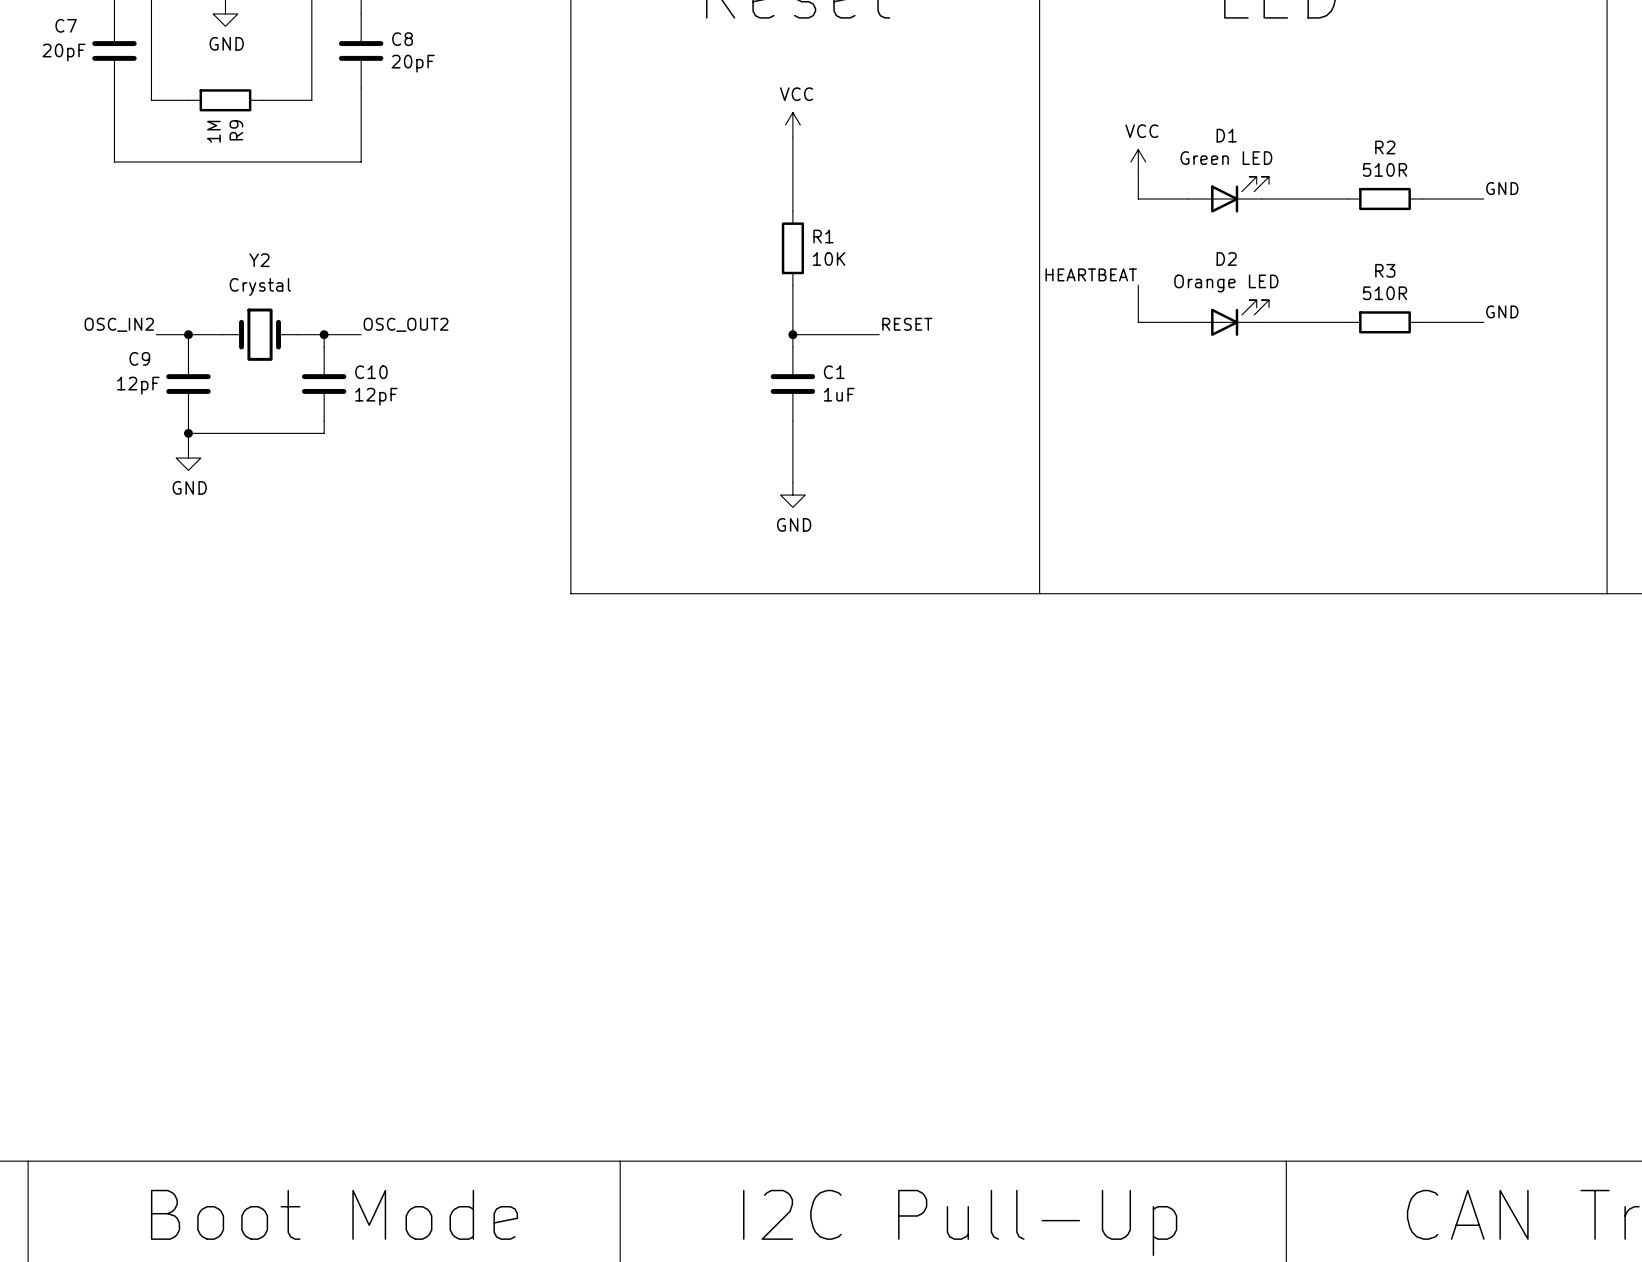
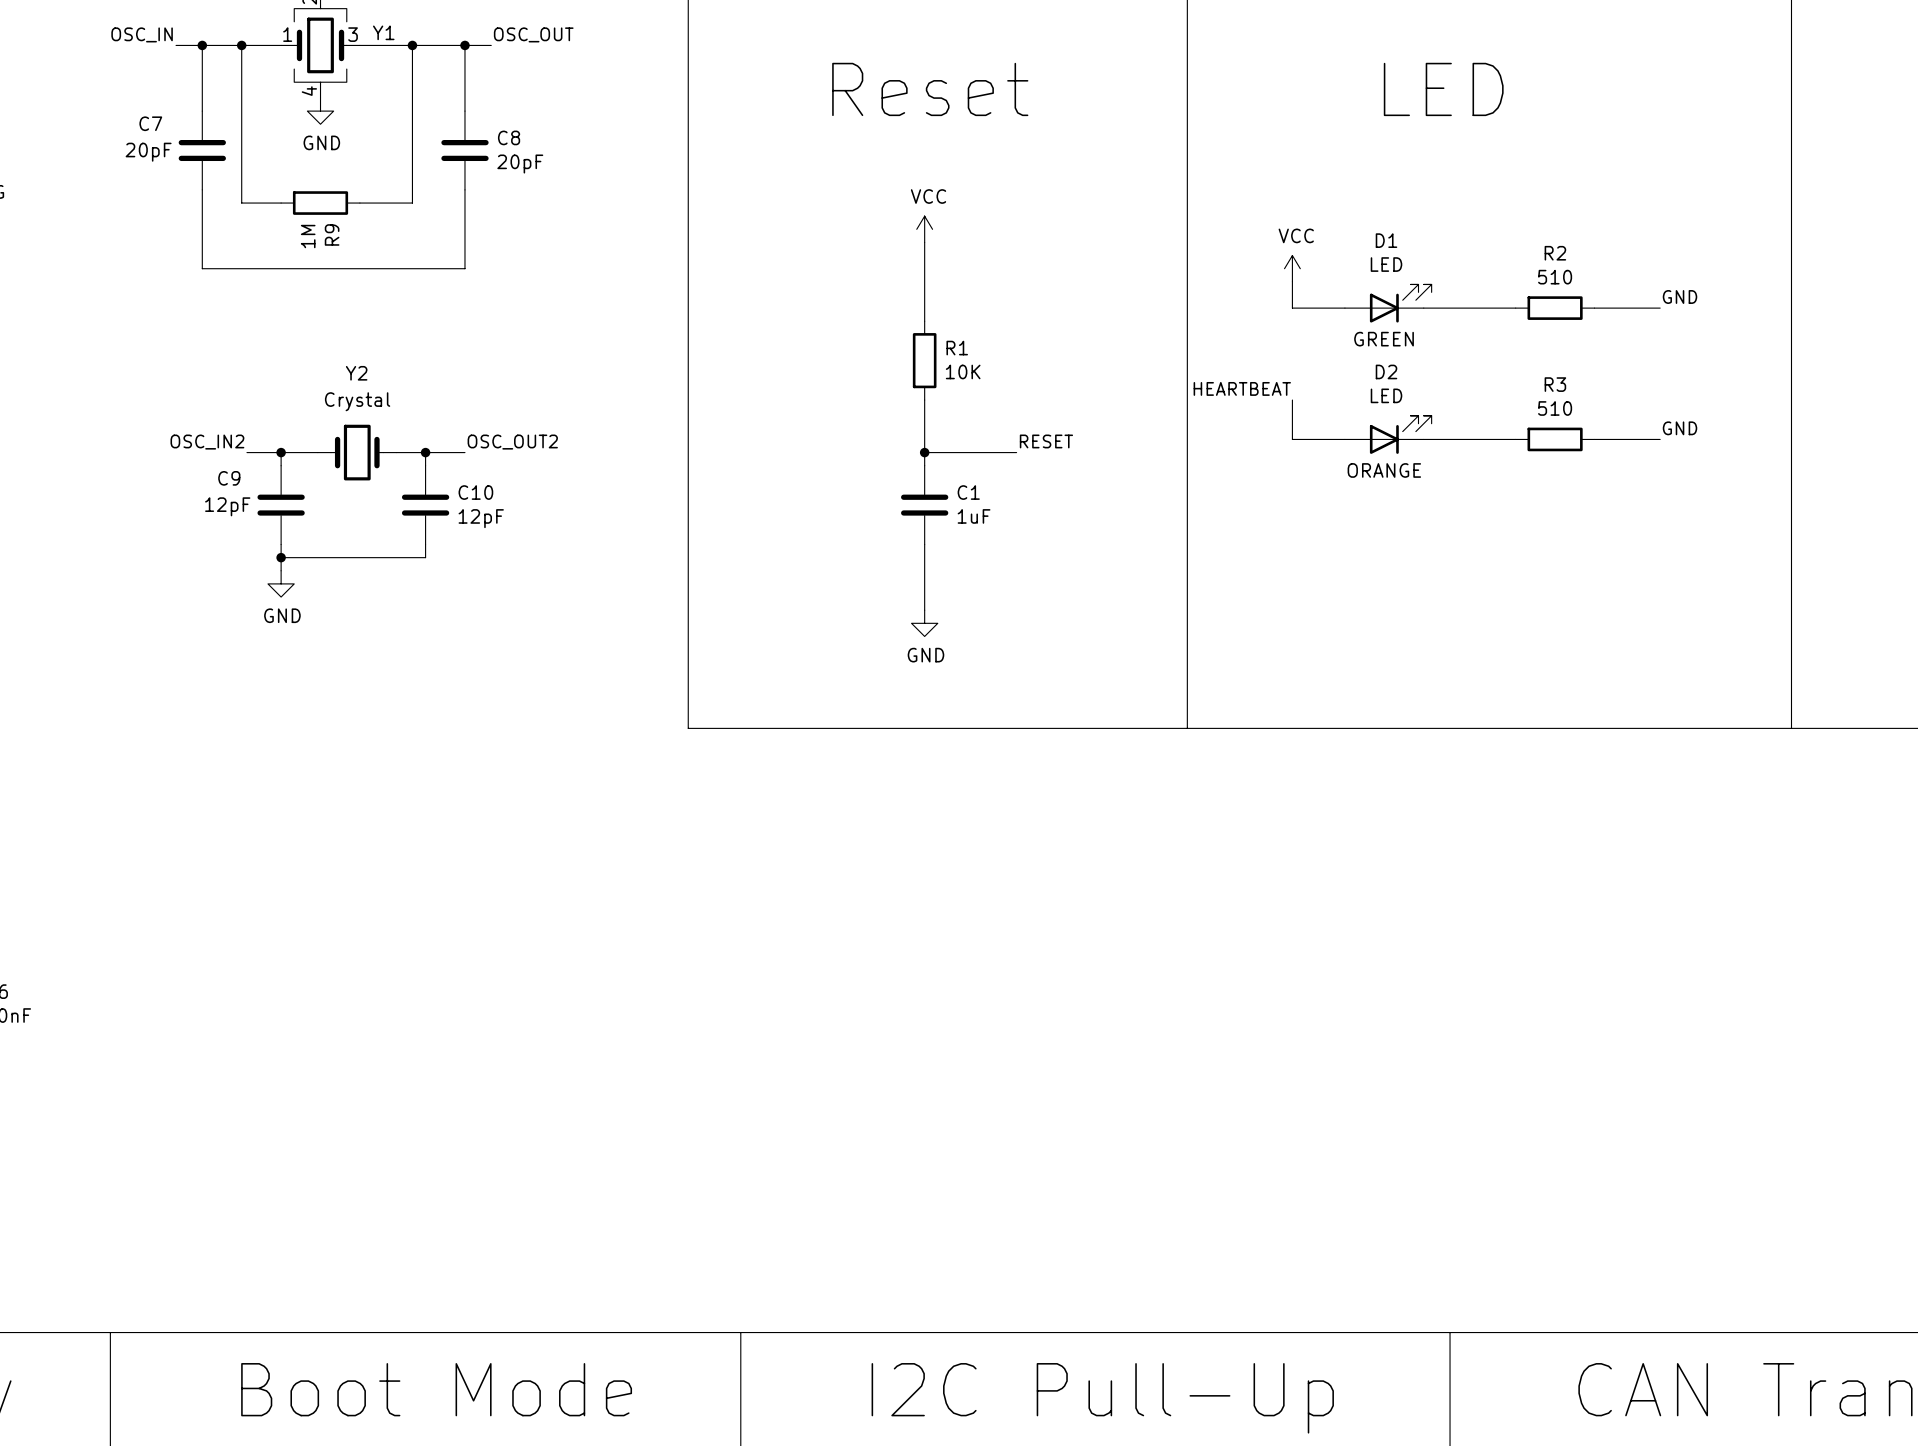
D1 value: Green LED (1226, 158) -> LED (1386, 264)
R2 value: 510R (1385, 169) -> 510 (1555, 277)
D1 text: none -> GREEN (1384, 339)
D2 value: Orange LED (1226, 283) -> LED (1386, 395)
R3 value: 510R (1385, 293) -> 510 (1555, 408)
D2 text: none -> ORANGE (1384, 470)

